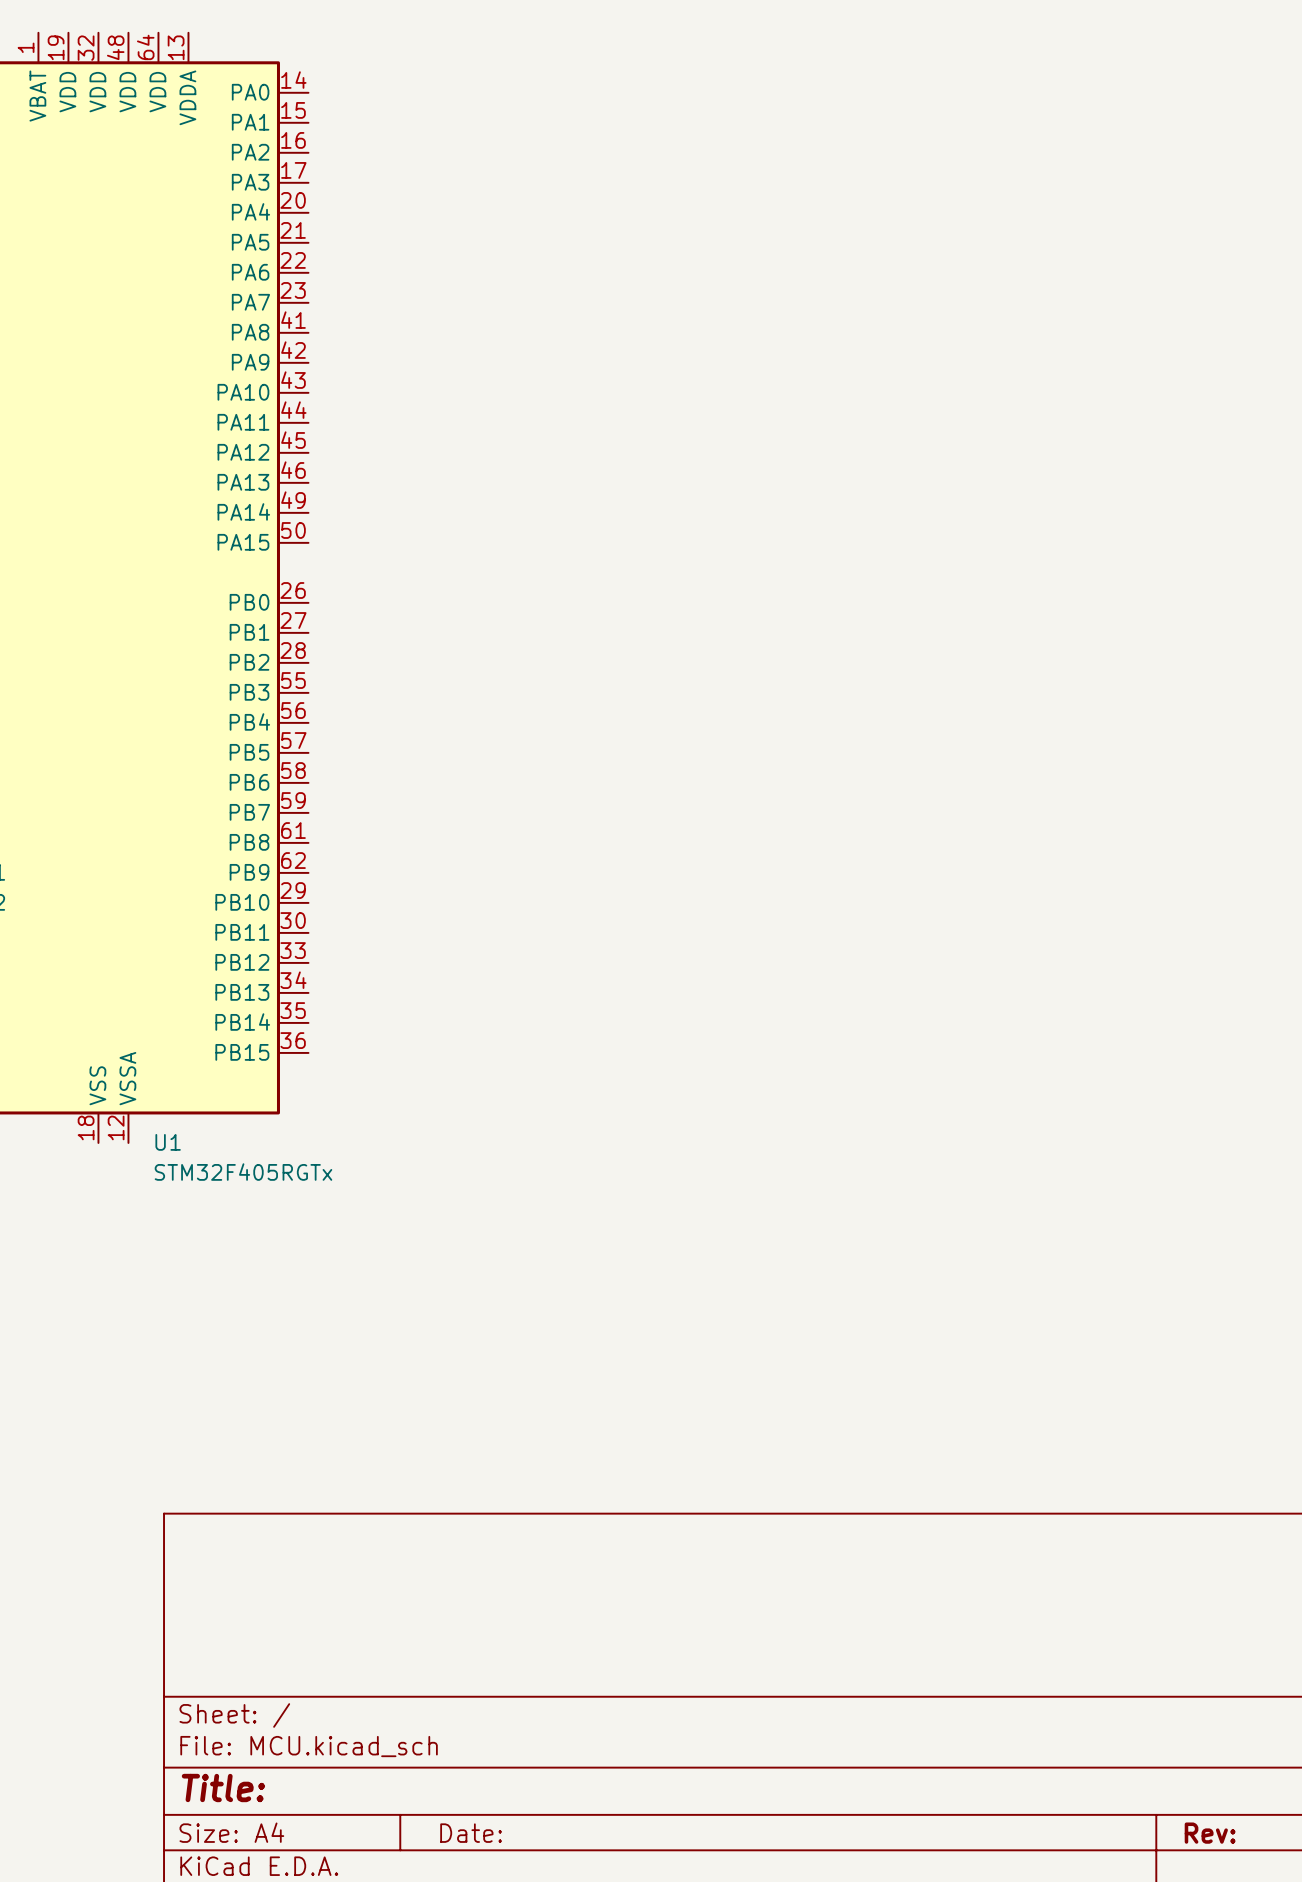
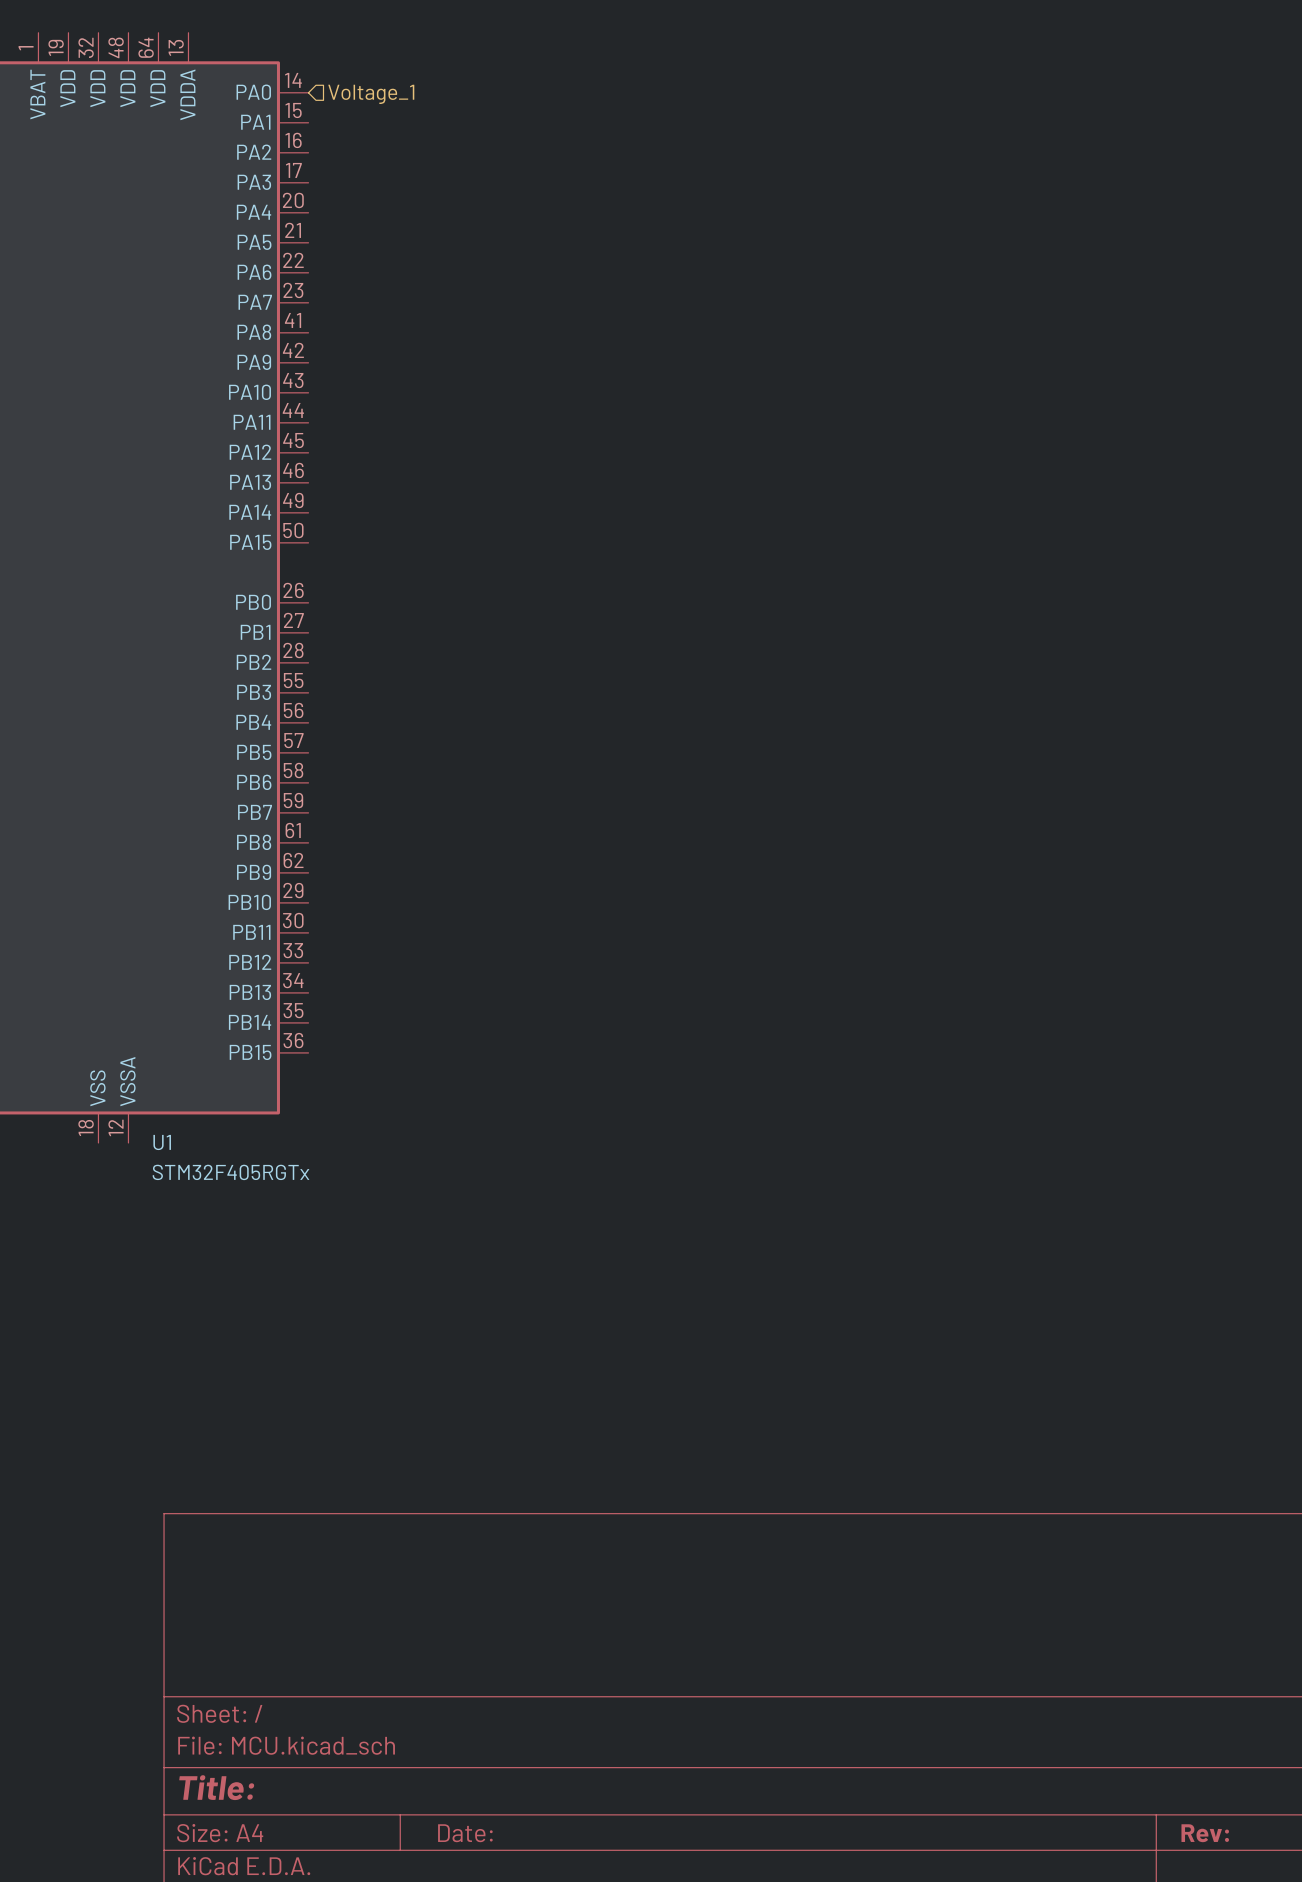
hierarchical label: none -> Voltage_1 (371, 94)

